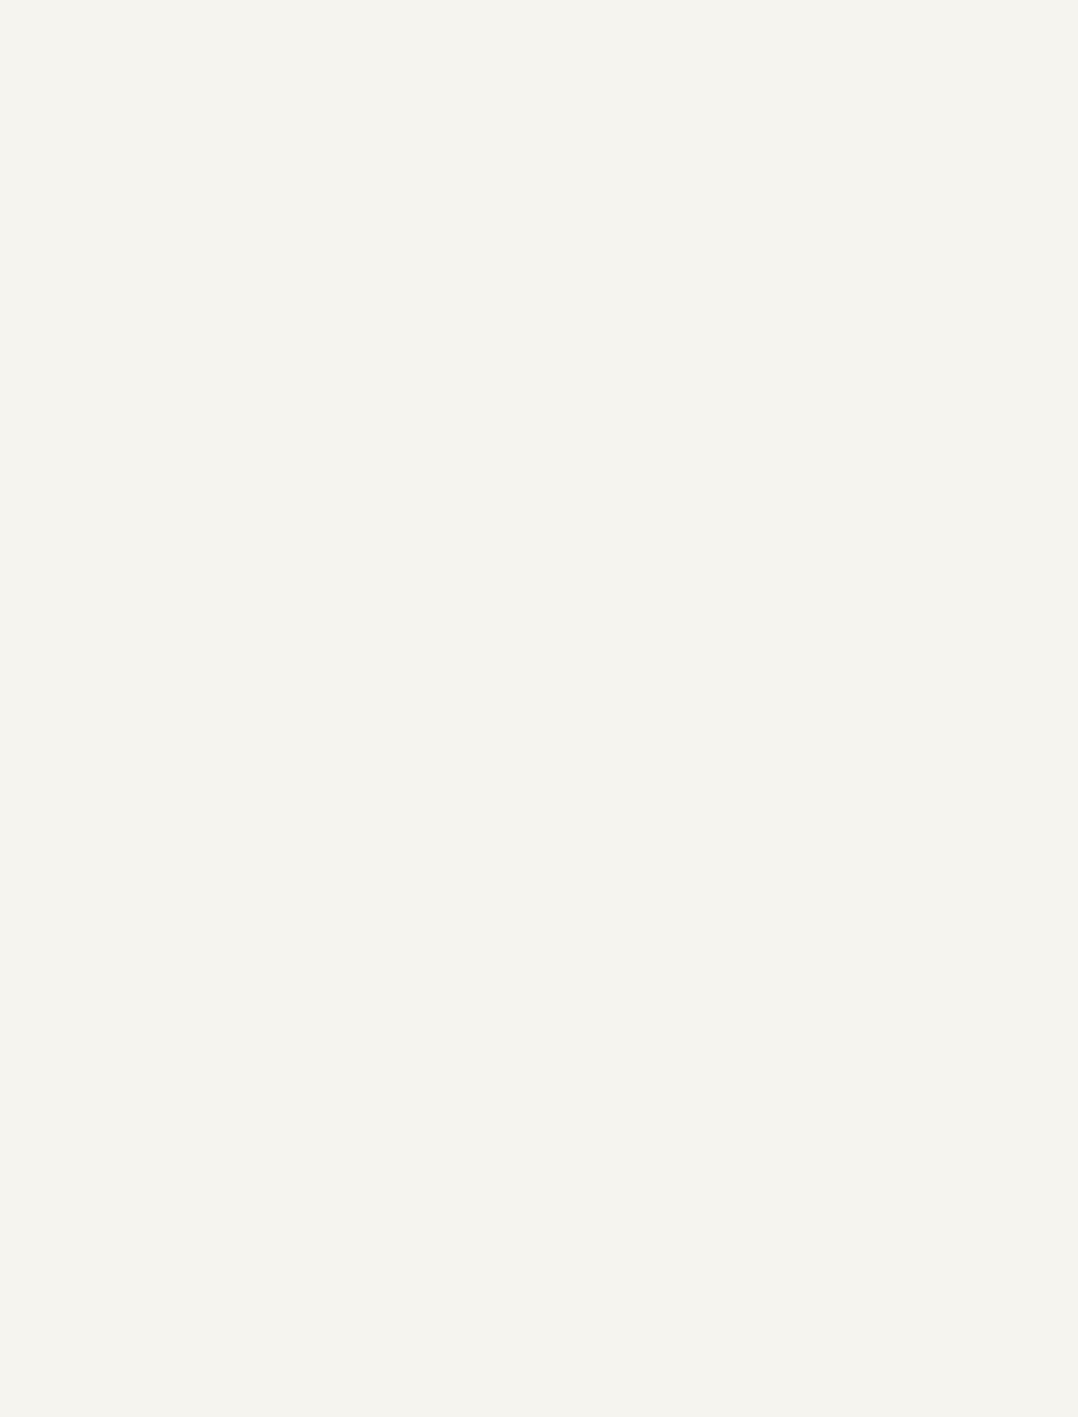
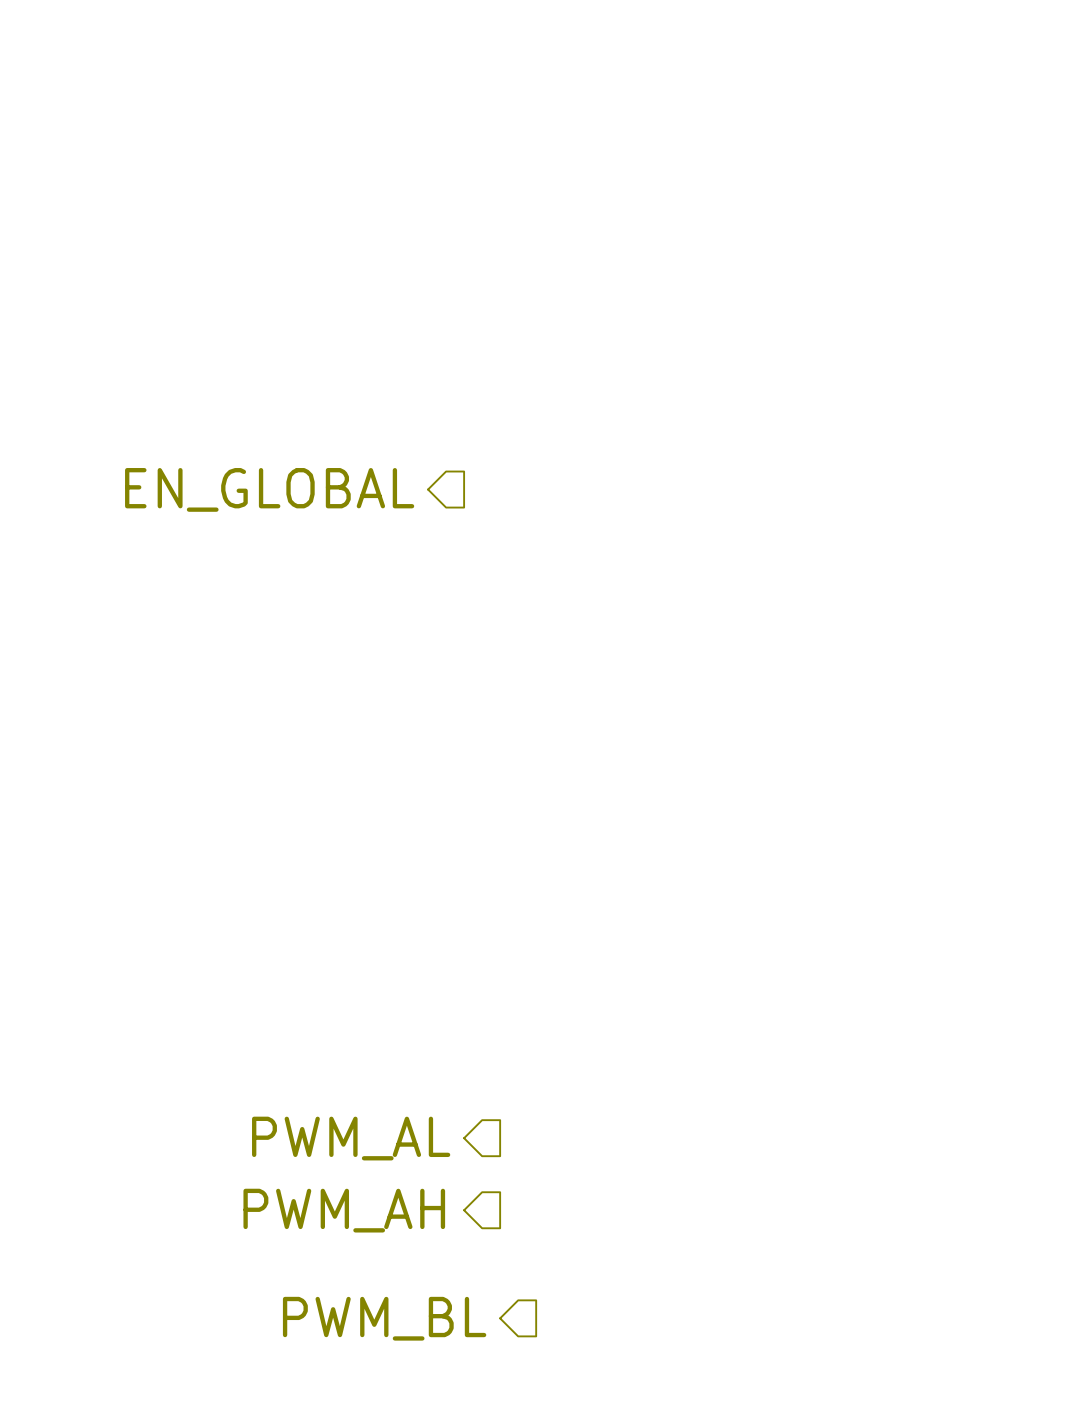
hierarchical label: none -> EN_GLOBAL (269, 489)
hierarchical label: none -> PWM_AL (351, 1138)
hierarchical label: none -> PWM_AH (344, 1210)
hierarchical label: none -> PWM_BL (384, 1318)

